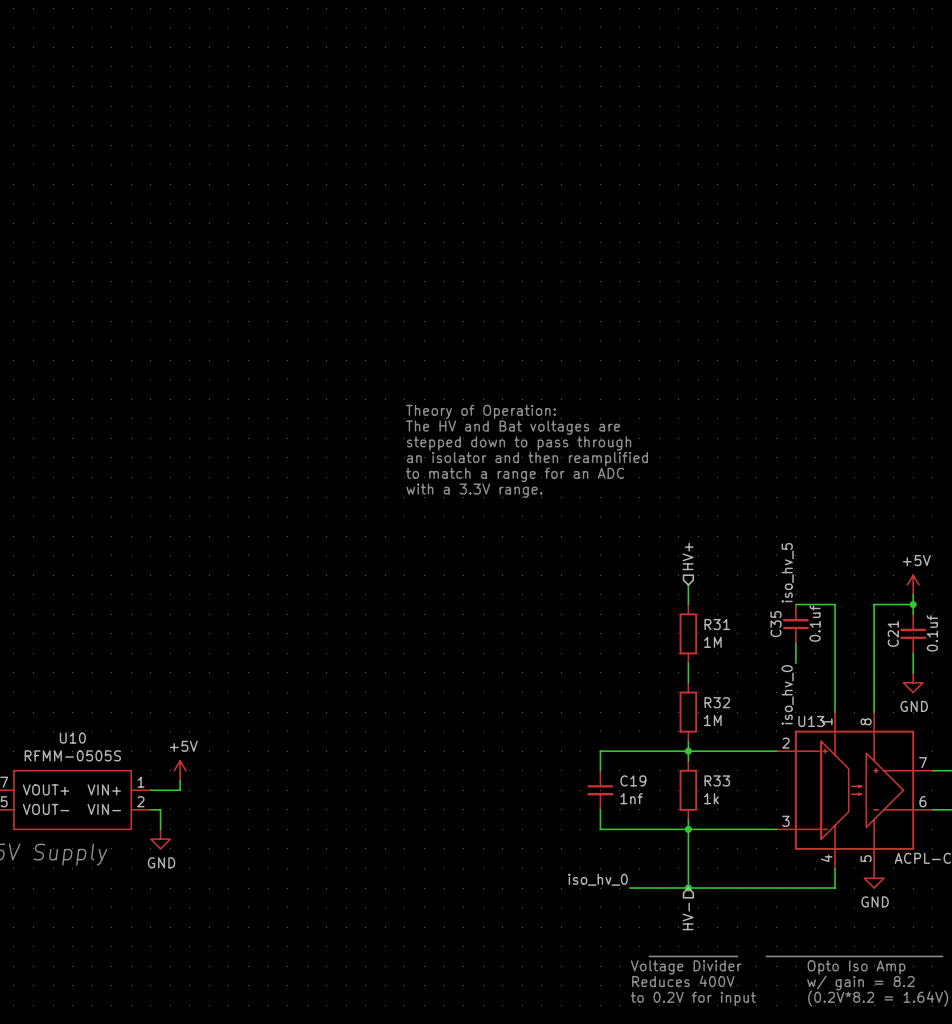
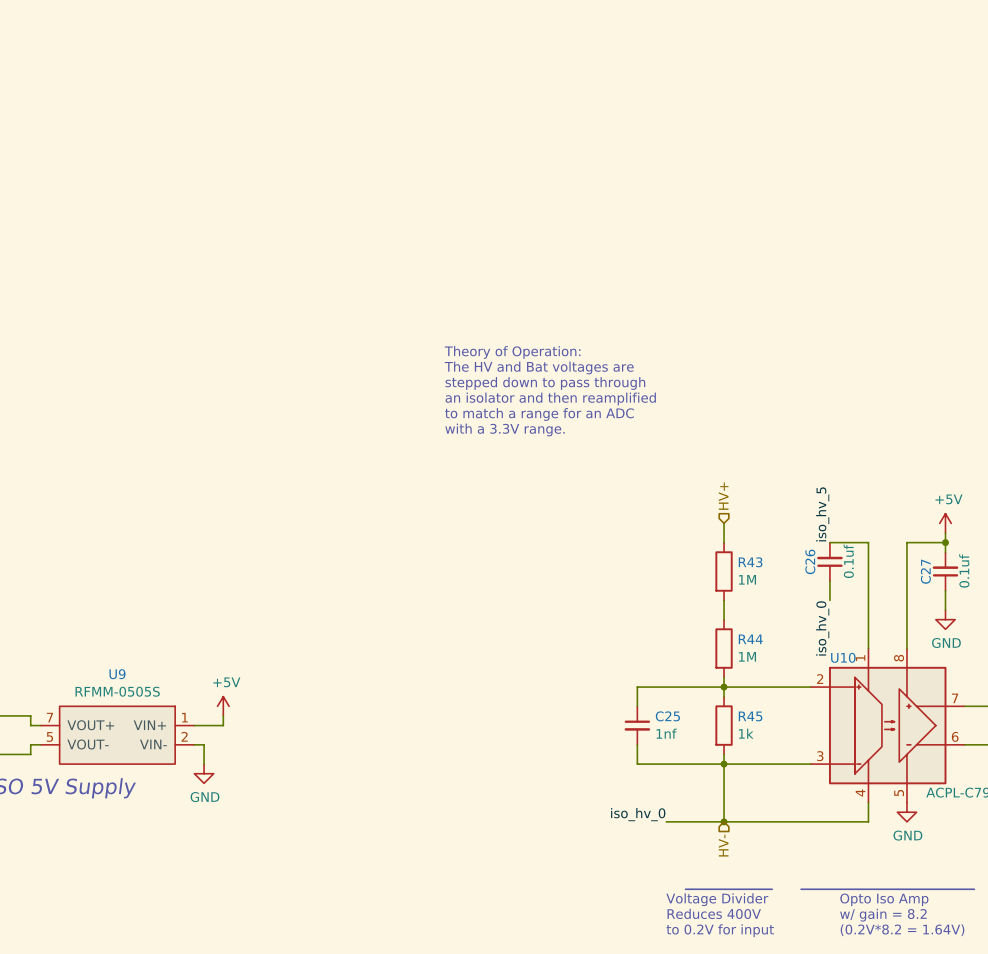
R31 name: R31 (717, 624) -> R43 (750, 562)
C35 name: C35 (776, 624) -> C26 (810, 561)
C21 name: C21 (893, 633) -> C27 (925, 571)
R32 name: R32 (717, 702) -> R44 (750, 639)
U13 name: U13 (811, 721) -> U10 (843, 657)
U10 name: U10 (72, 738) -> U9 (117, 674)
C19 name: C19 (633, 780) -> C25 (667, 716)
R33 name: R33 (717, 780) -> R45 (750, 716)

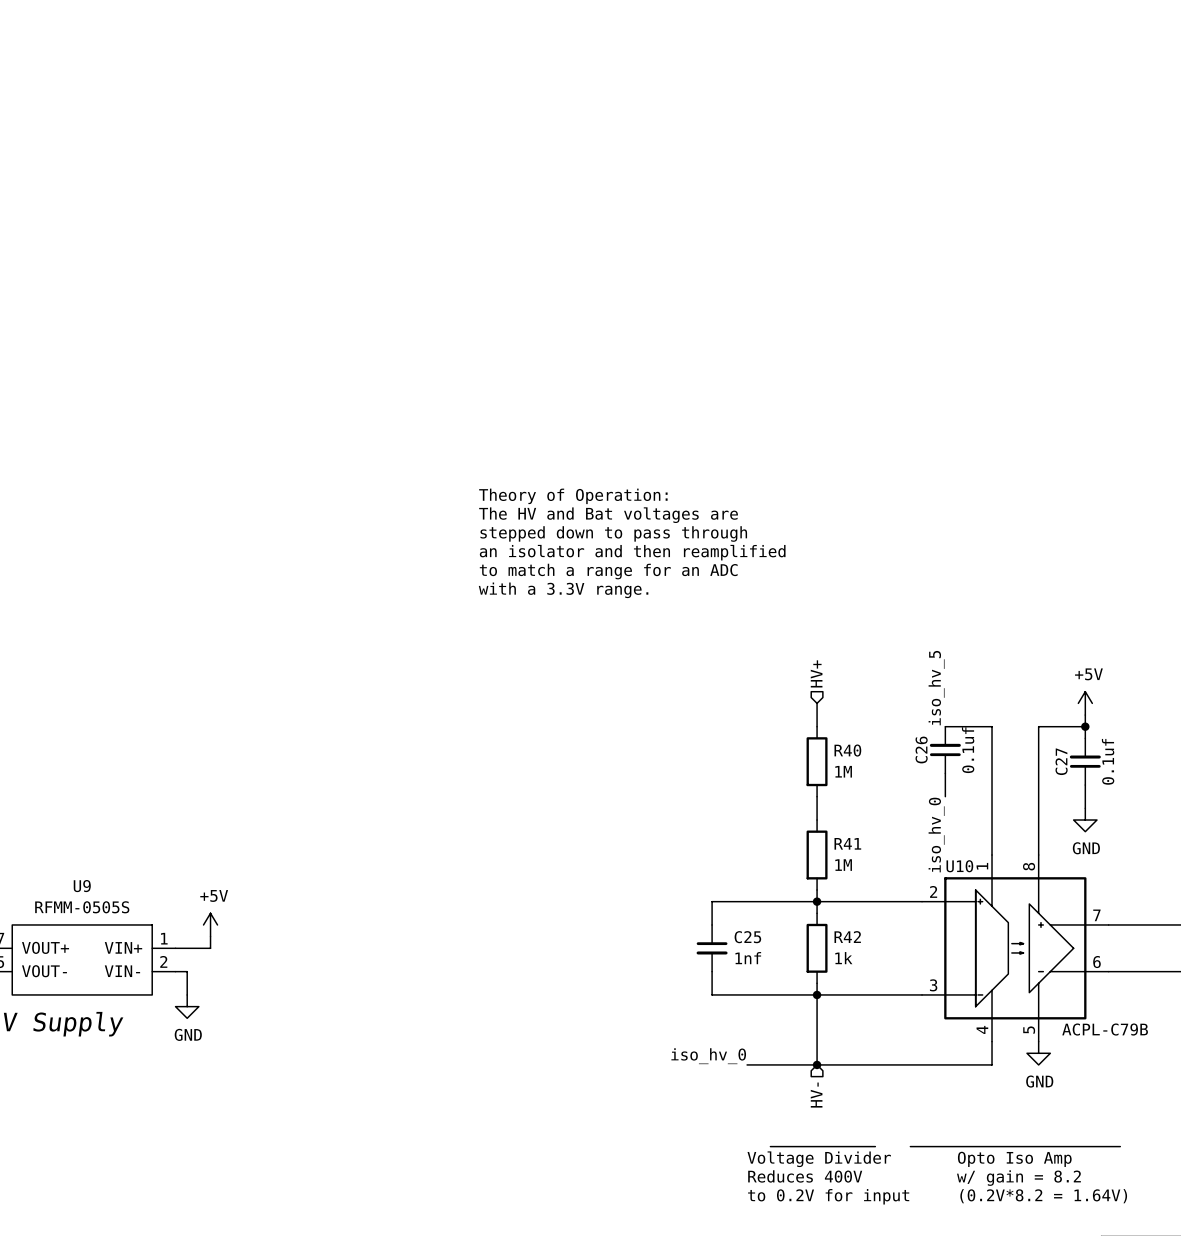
R43 name: R43 (750, 562) -> R40 (847, 750)
R44 name: R44 (750, 639) -> R41 (847, 843)
R45 name: R45 (750, 716) -> R42 (847, 937)

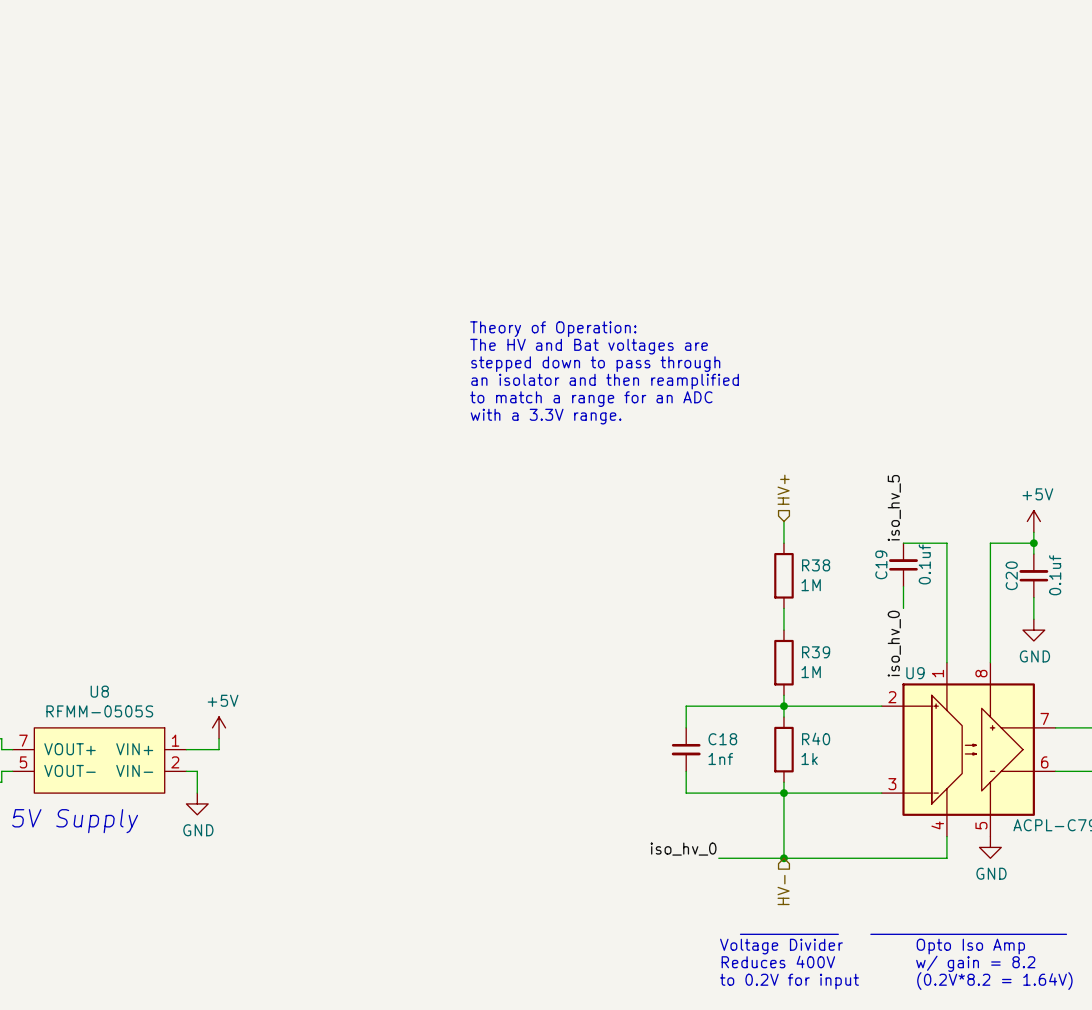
R40 name: R40 (847, 750) -> R38 (816, 565)
C26 name: C26 (921, 750) -> C19 (881, 564)
C27 name: C27 (1061, 761) -> C20 (1011, 575)
R41 name: R41 (847, 843) -> R39 (816, 652)
U10 name: U10 (959, 866) -> U9 (915, 673)
U9 name: U9 (82, 886) -> U8 (99, 691)
C25 name: C25 (747, 937) -> C18 (722, 739)
R42 name: R42 (847, 937) -> R40 (816, 738)

